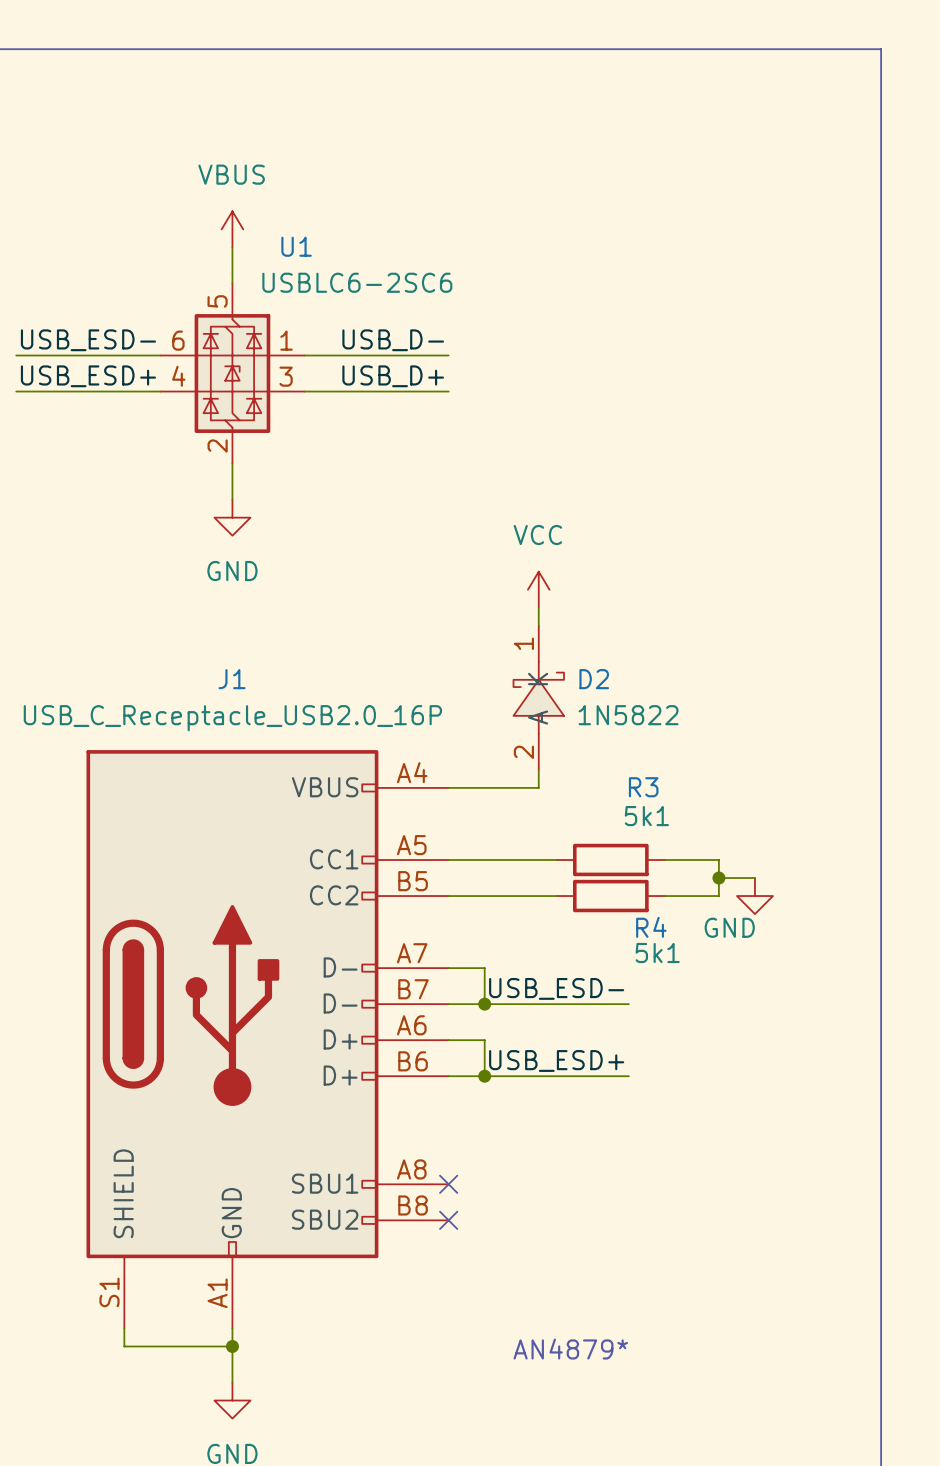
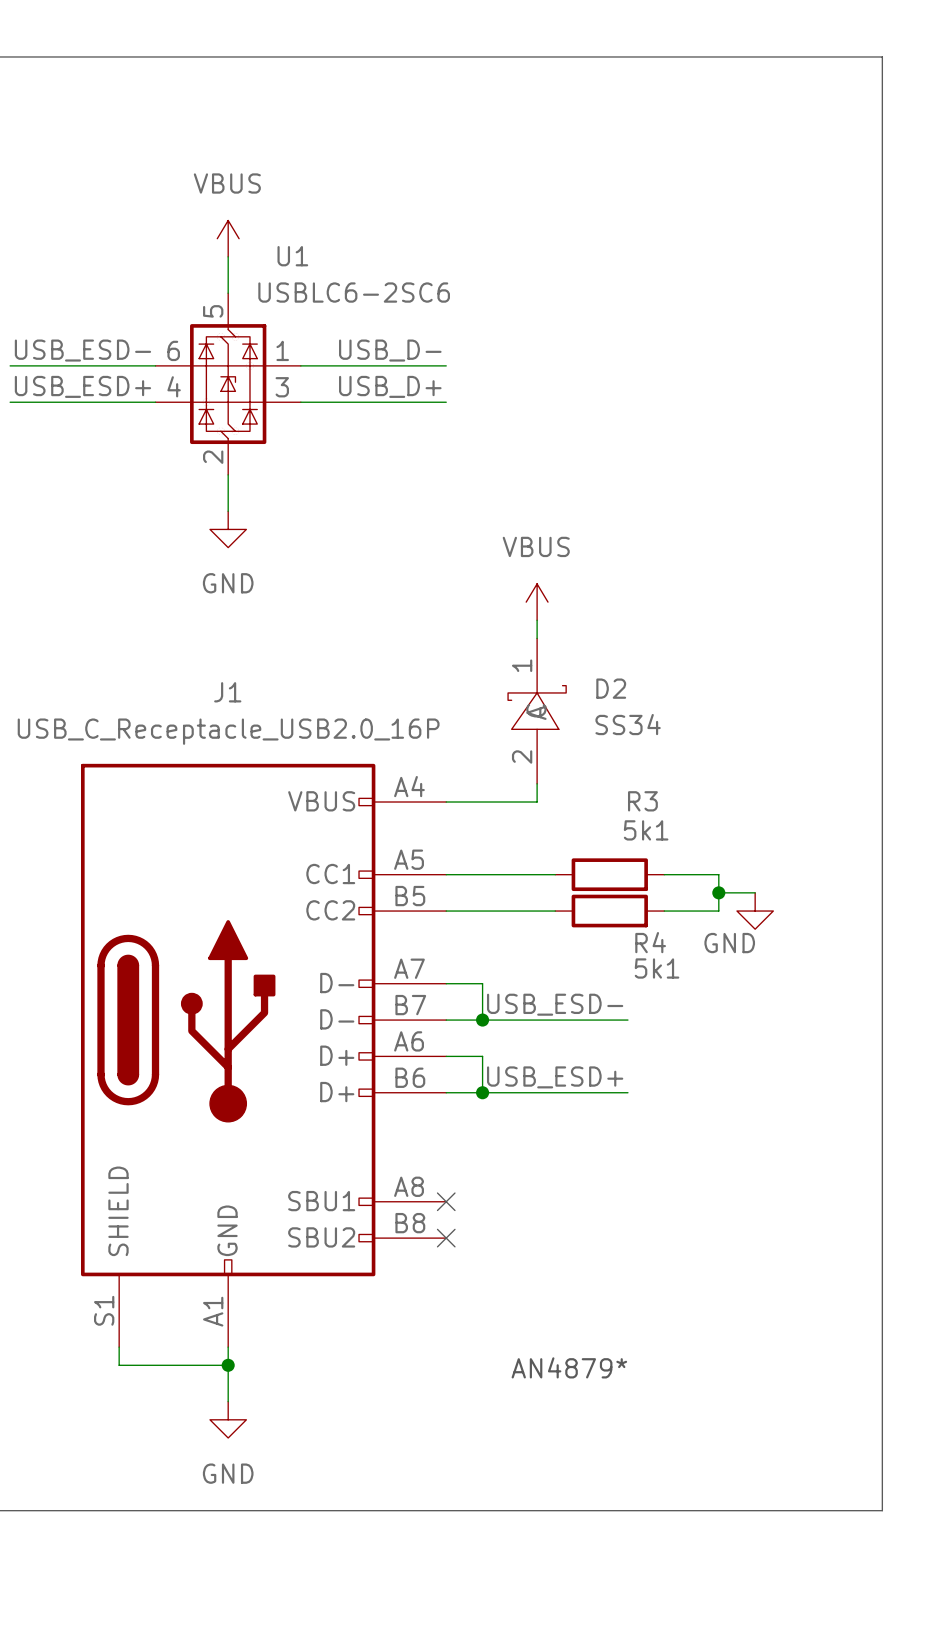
power symbol: VCC (538, 589) -> VBUS (537, 602)
D2 symbol: [513, 625, 565, 770] -> [508, 638, 567, 784]
D2 value: 1N5822 (628, 715) -> SS34 (628, 724)

